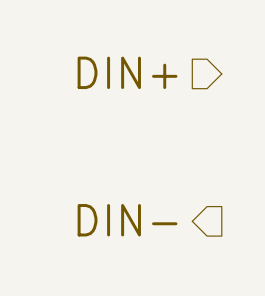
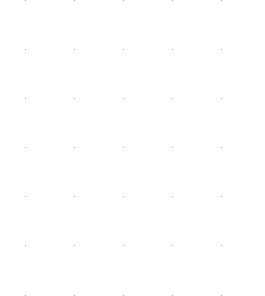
hierarchical label: DIN+ (127, 72) -> none
hierarchical label: DIN- (127, 220) -> none

